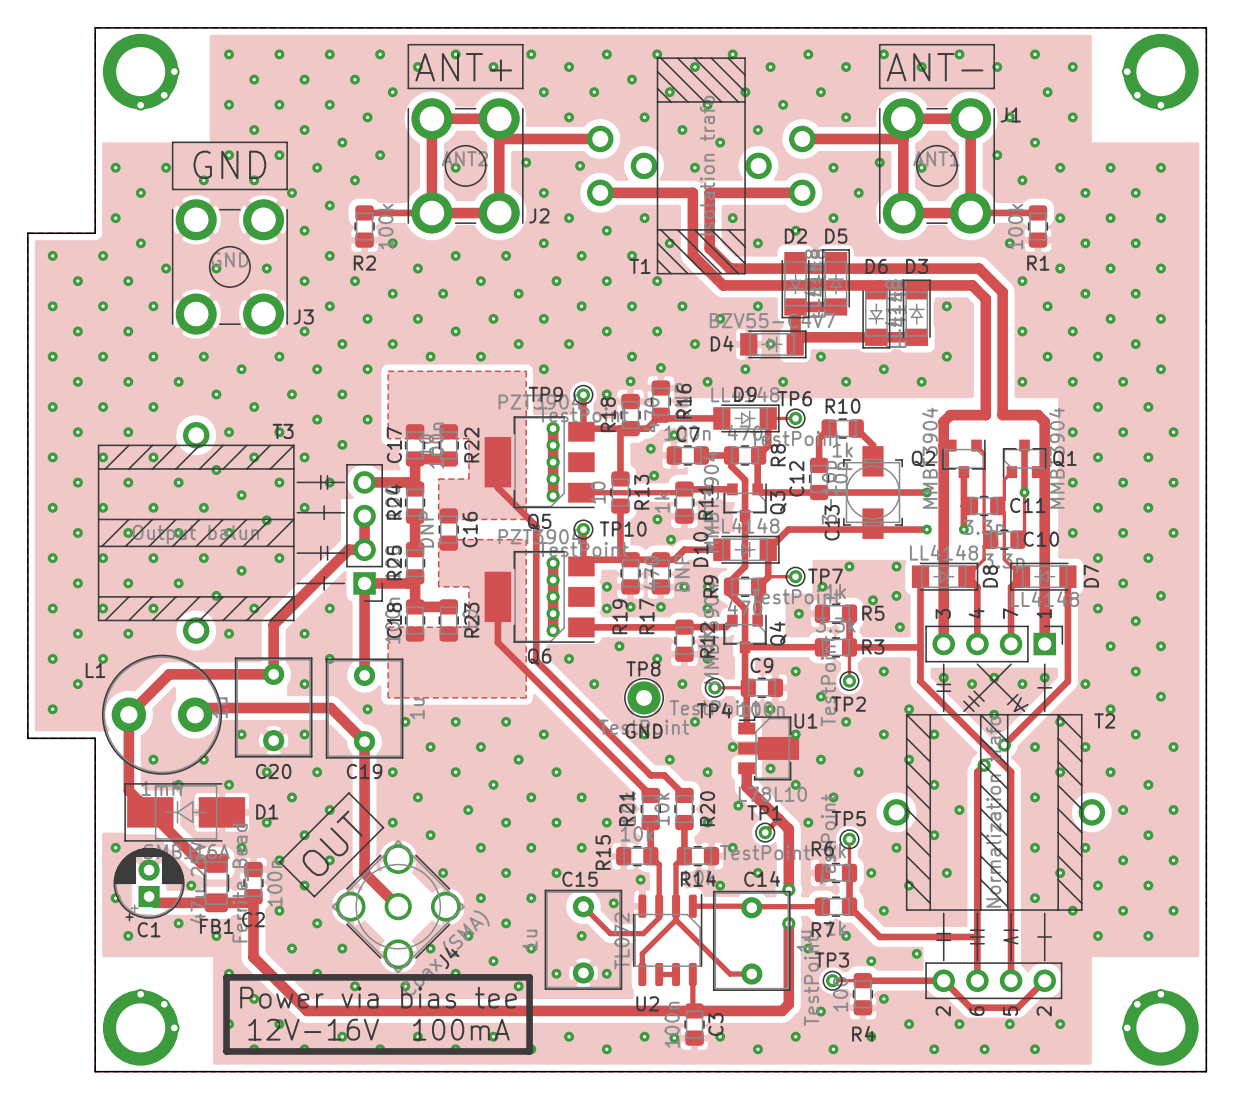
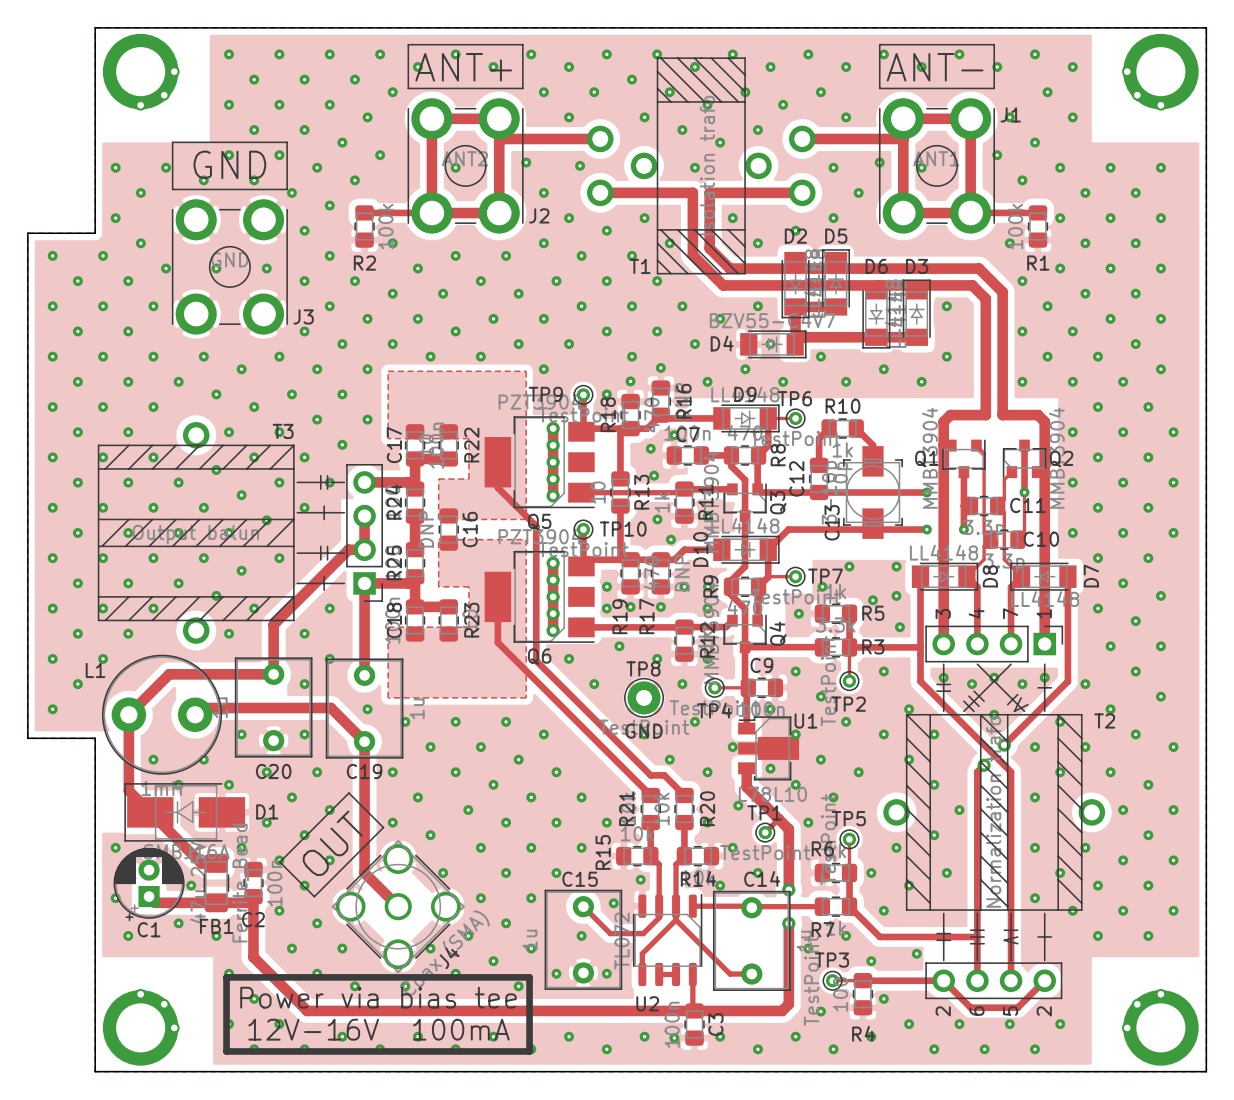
Q2 name position: Q2 (923, 458) -> Q2 (1061, 458)
Q1 name position: Q1 (1064, 458) -> Q1 (926, 458)

